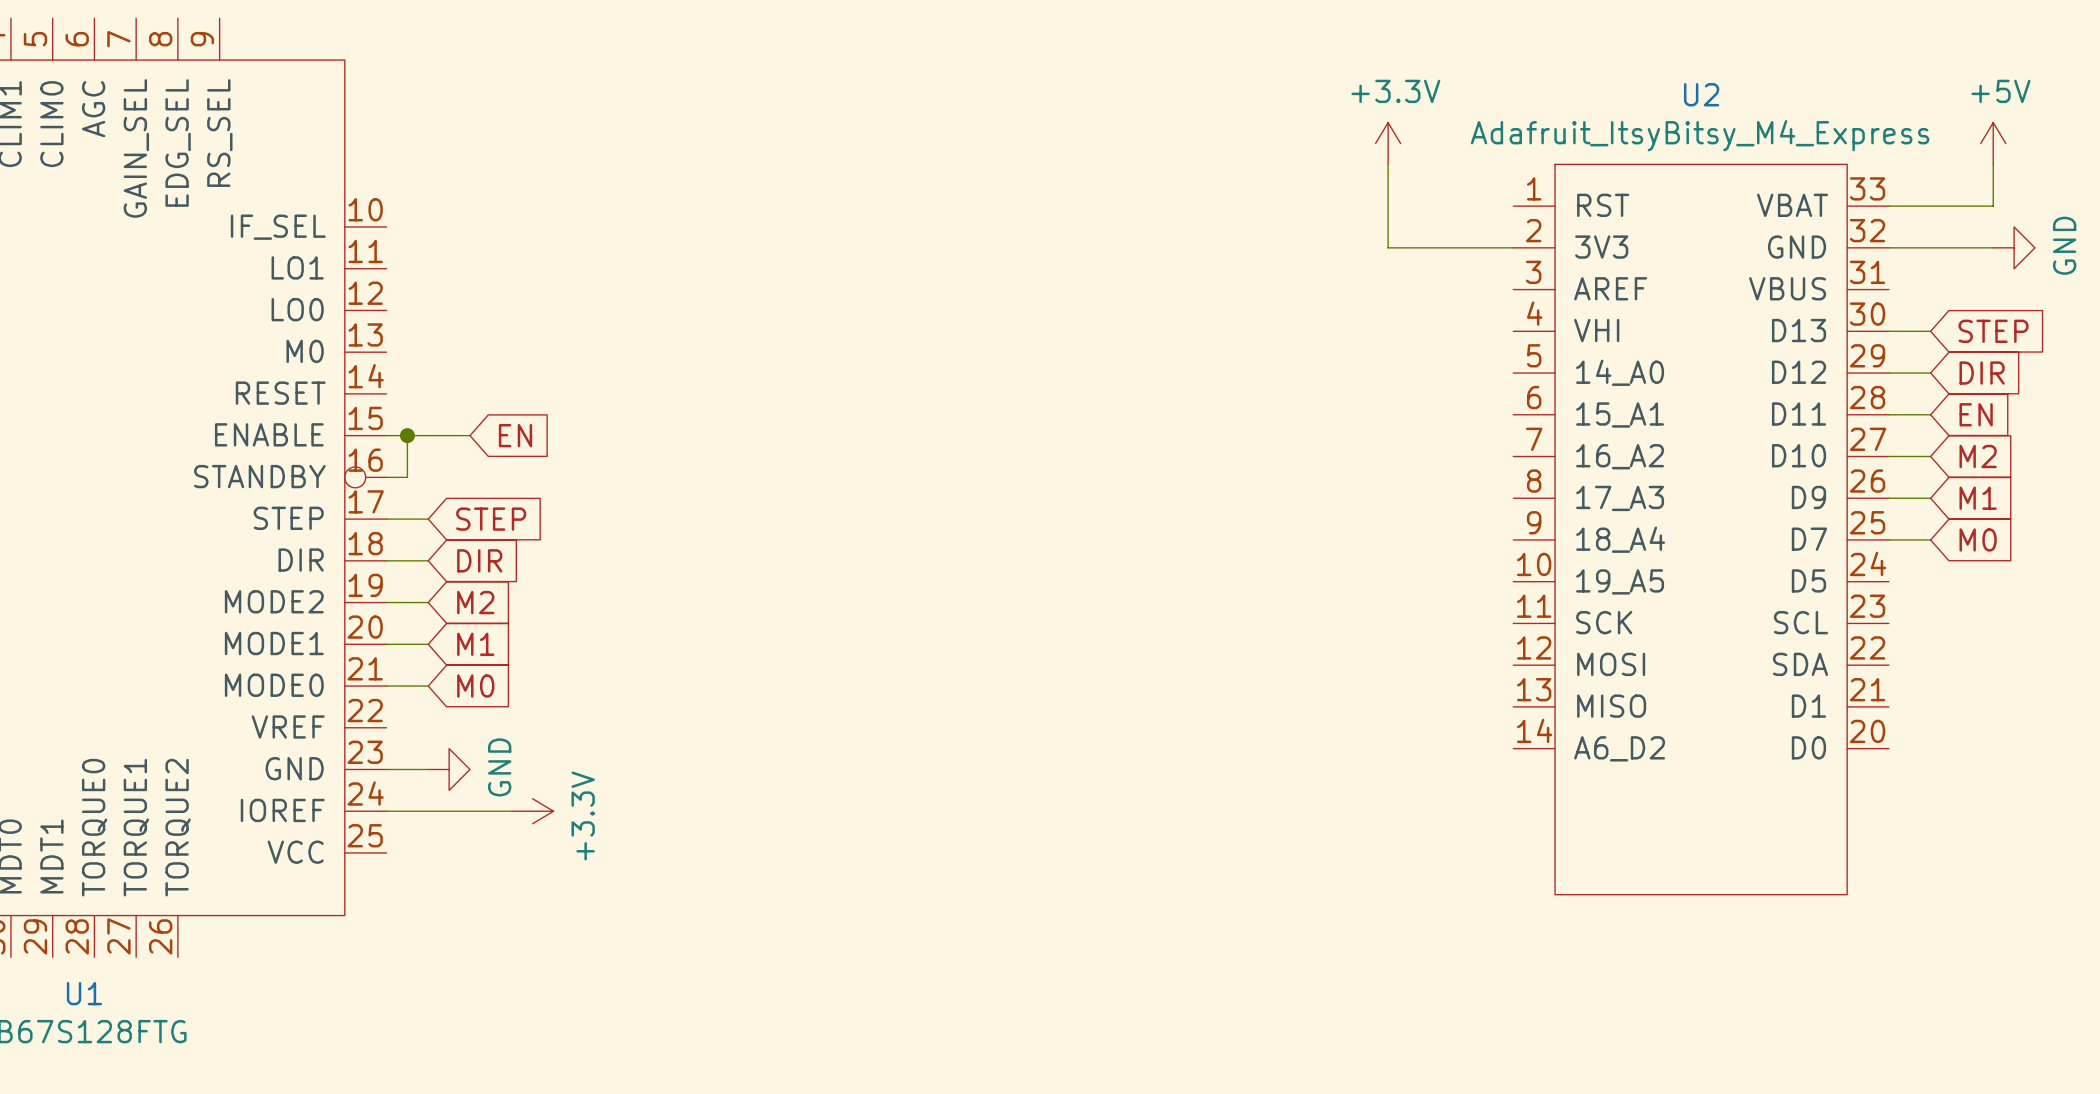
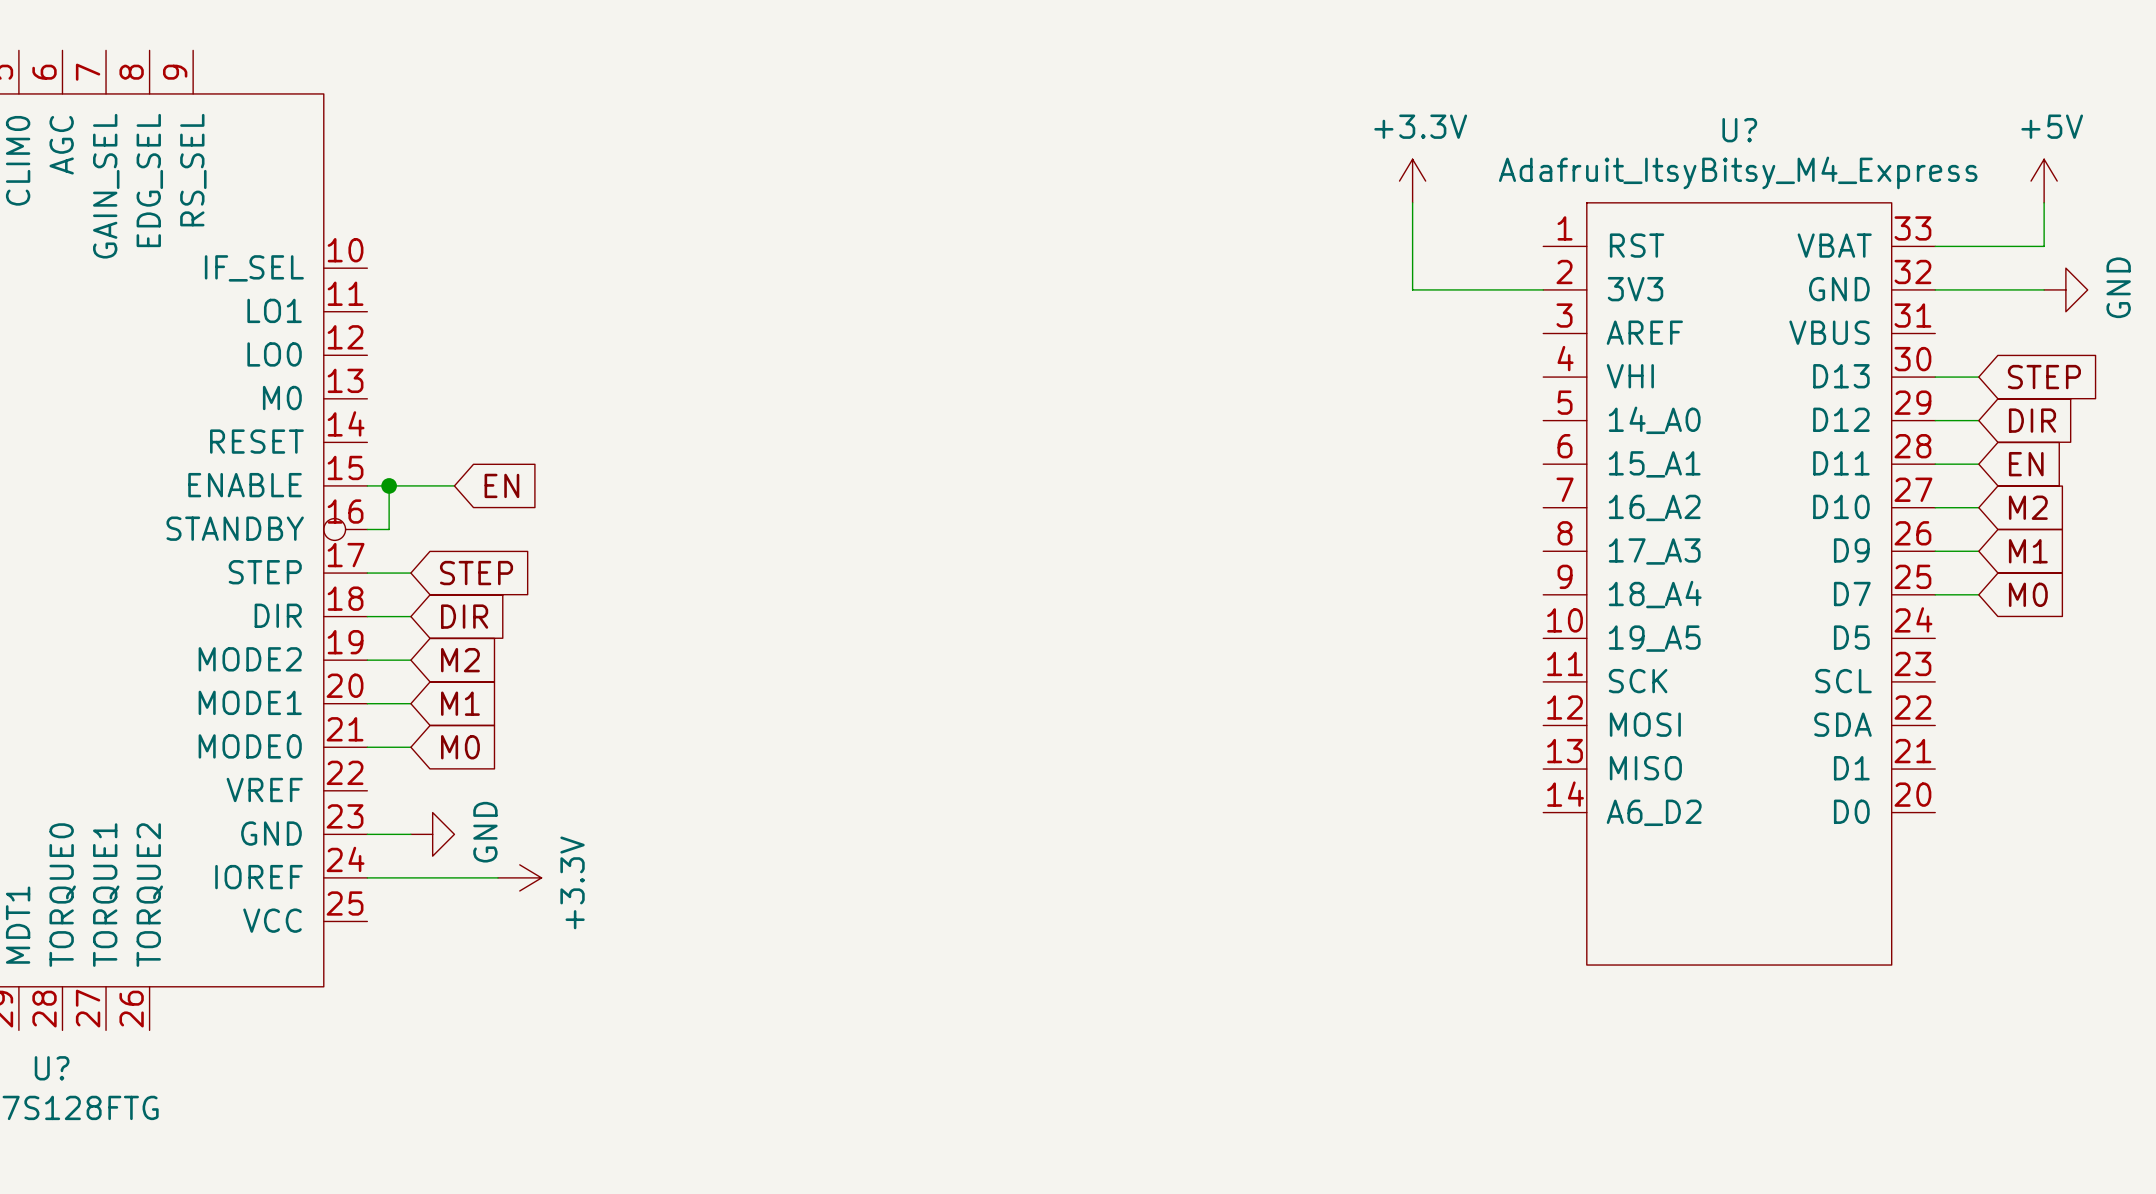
U2 name: U2 (1701, 94) -> U? (1739, 130)
U1 name: U1 (84, 993) -> U? (52, 1068)

